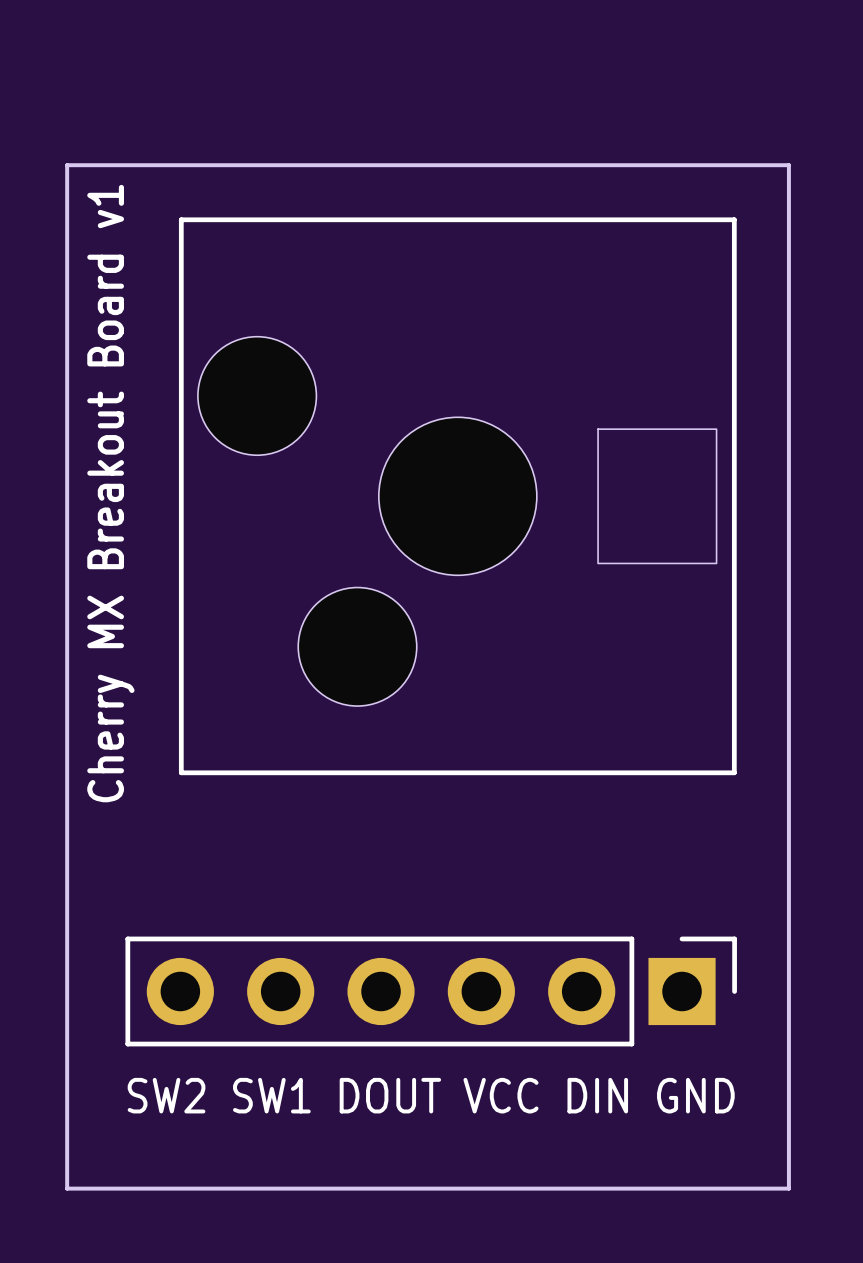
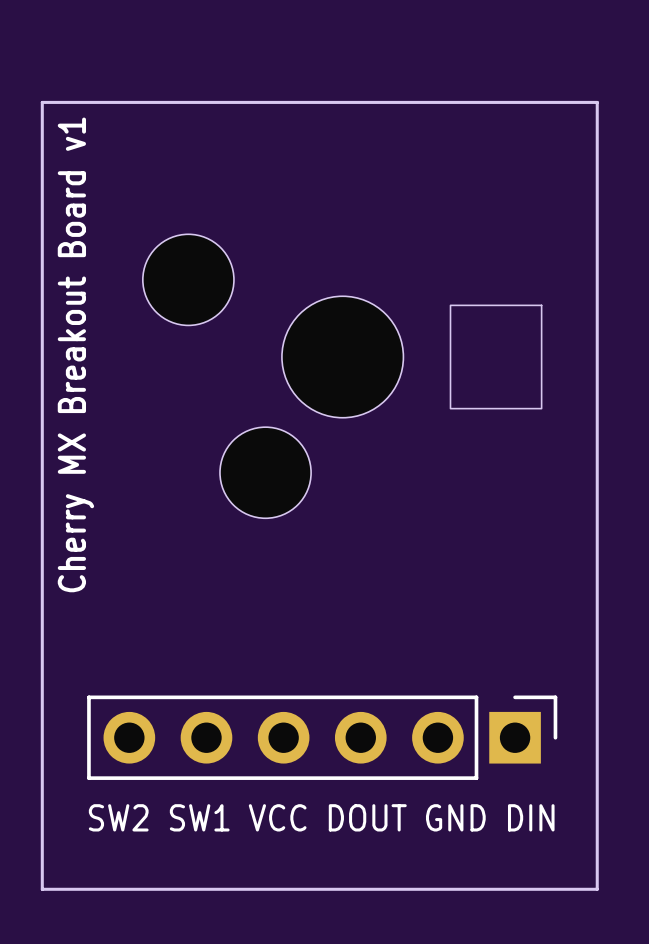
part footprint: [178, 217, 737, 776] -> [142, 234, 542, 519]
text: SW2 SW1 DOUT VCC DIN GND (431, 1095) -> SW2 SW1 VCC DOUT GND DIN (321, 817)

